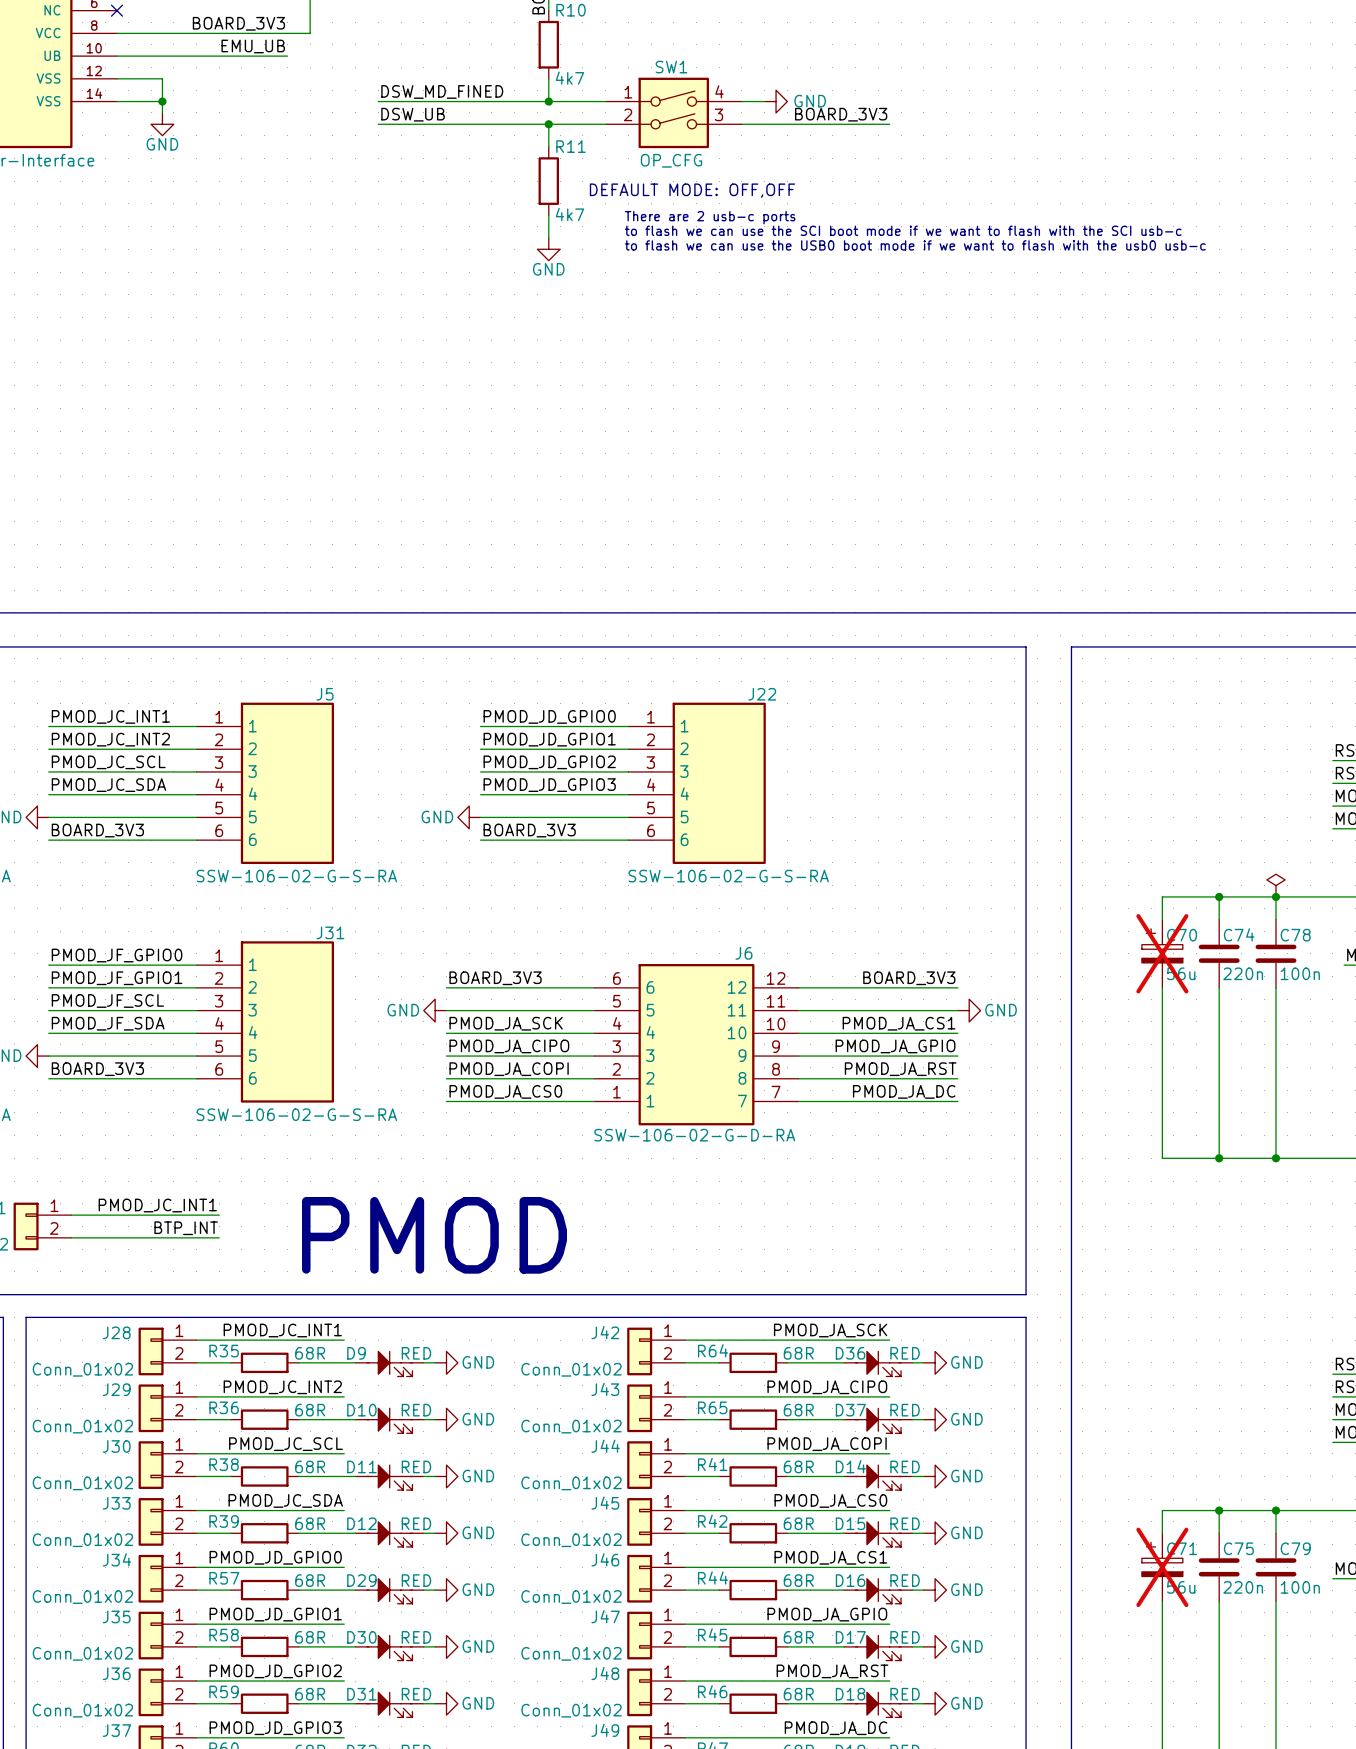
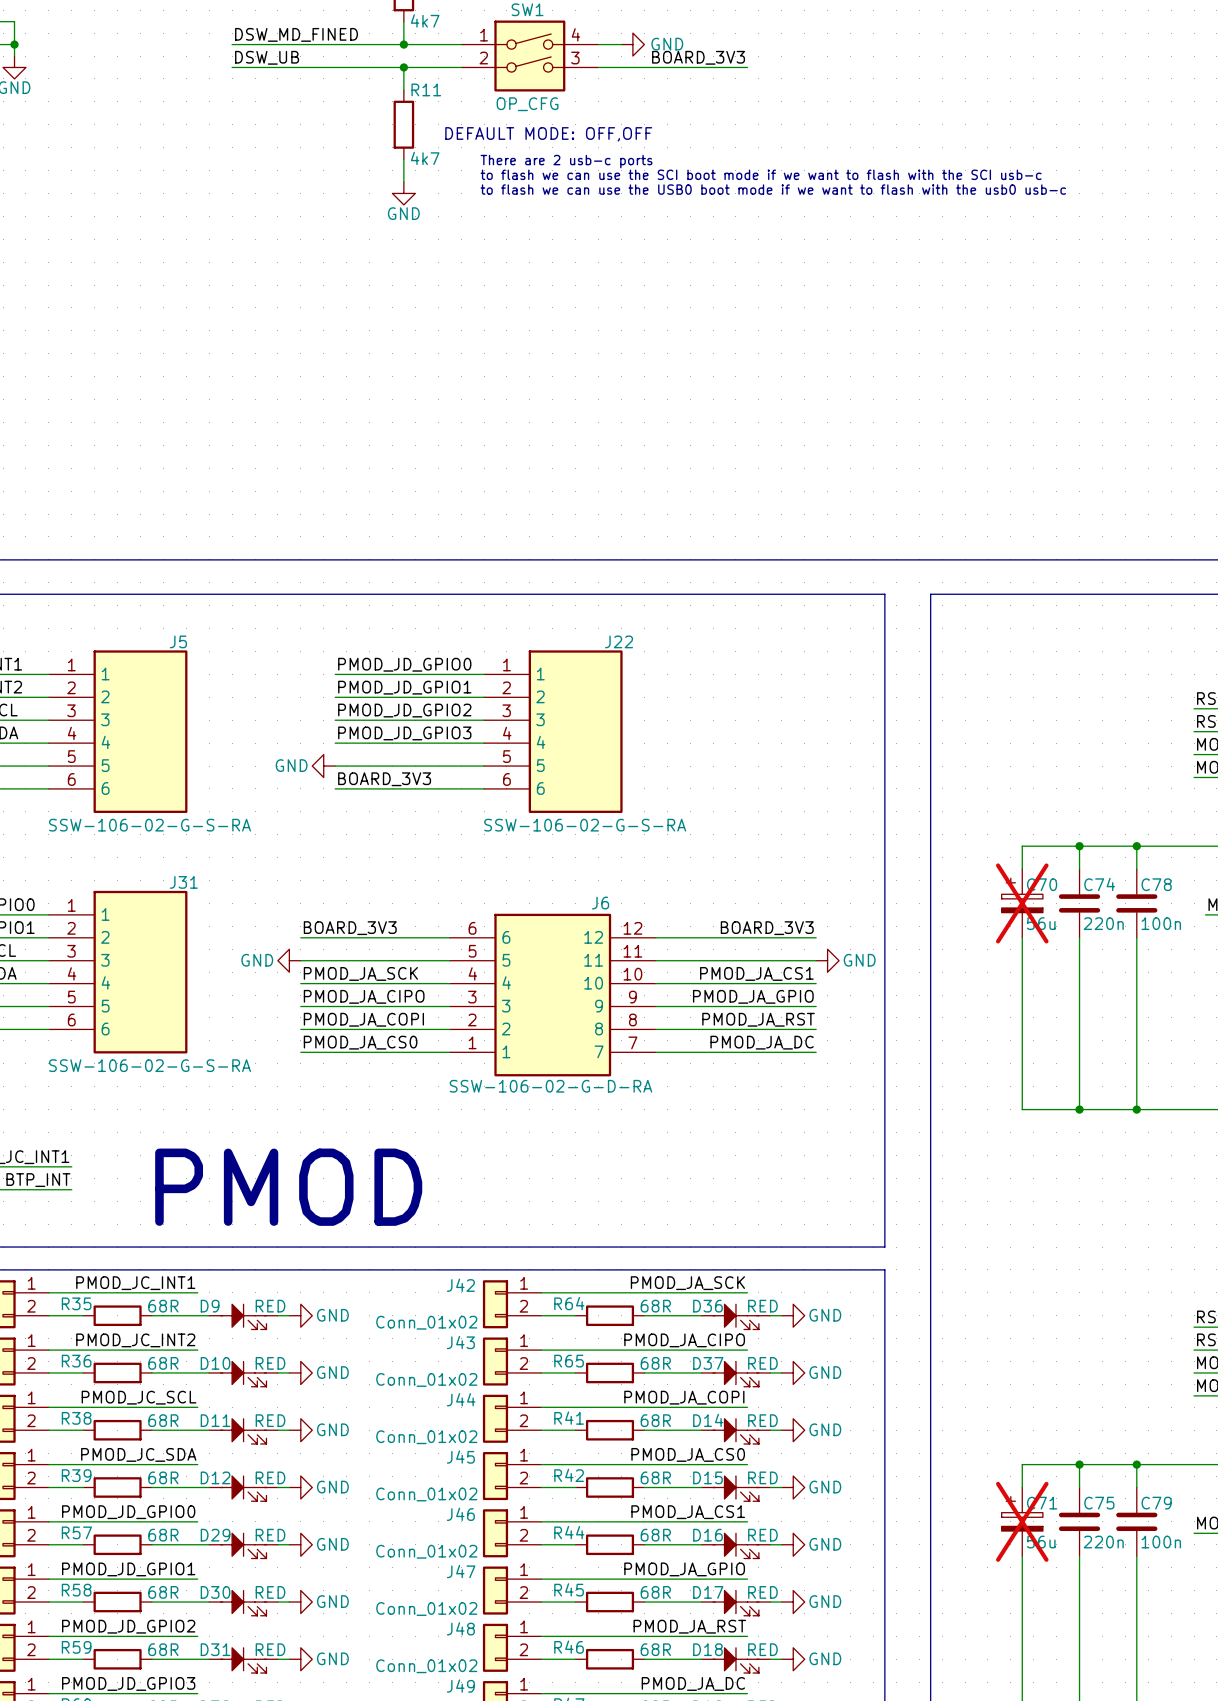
power symbol: (1276, 885) -> none

